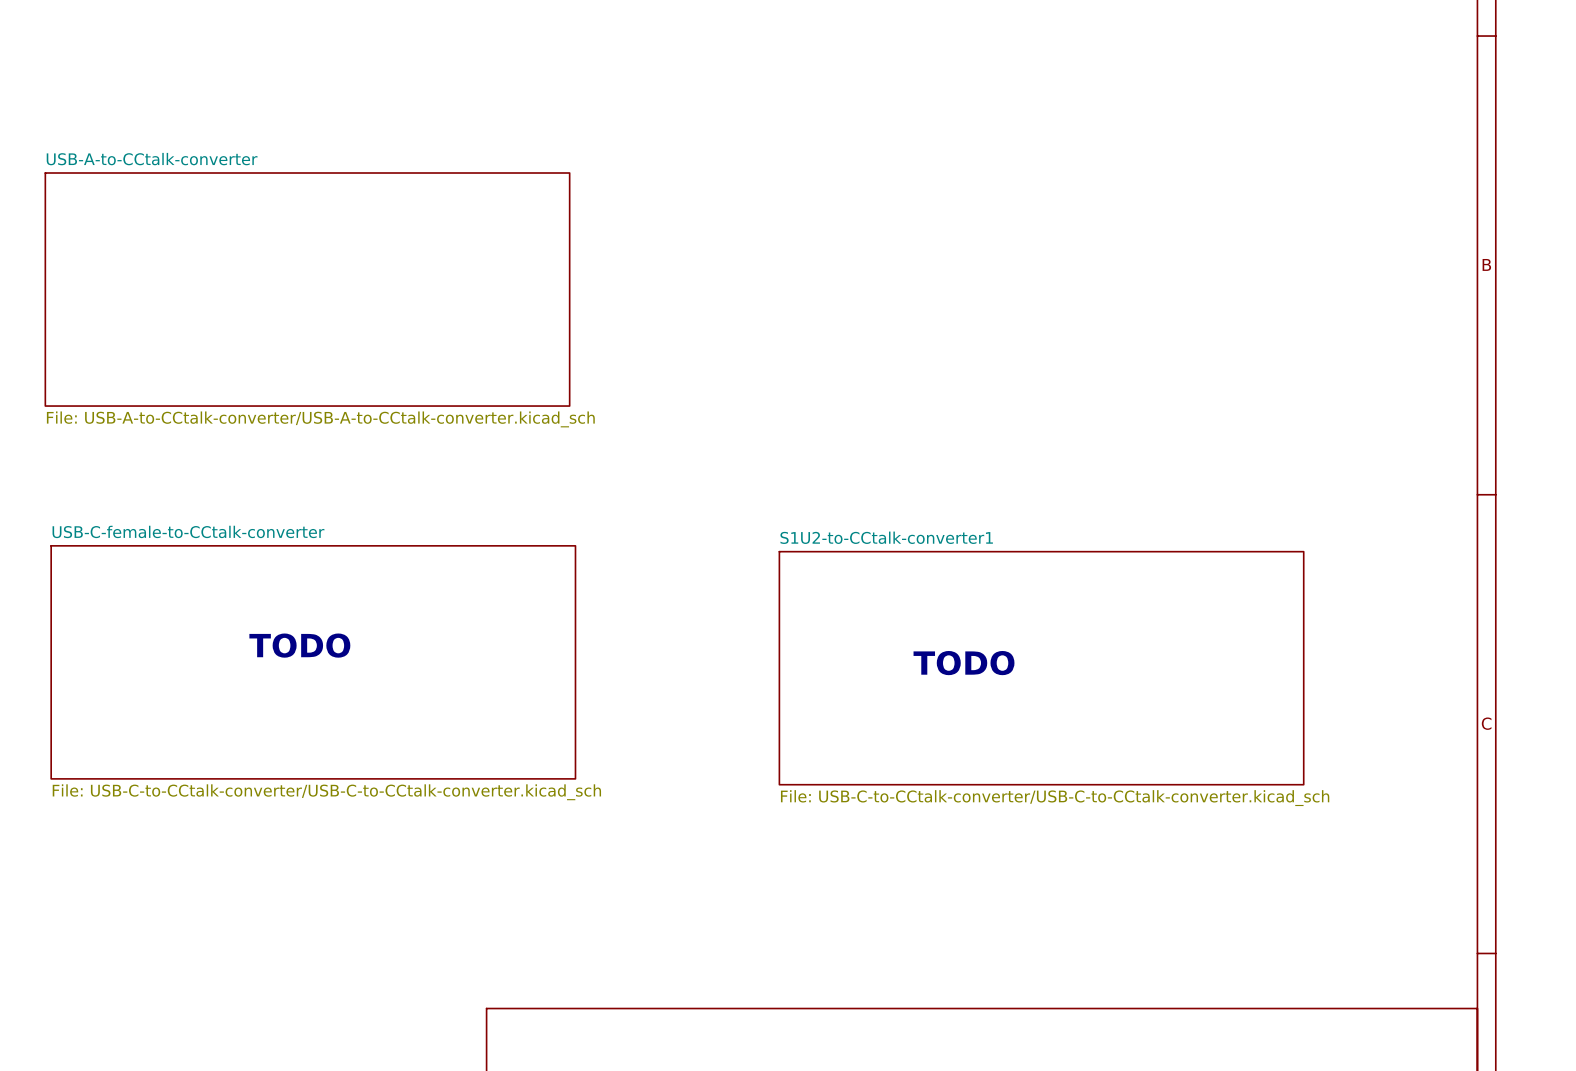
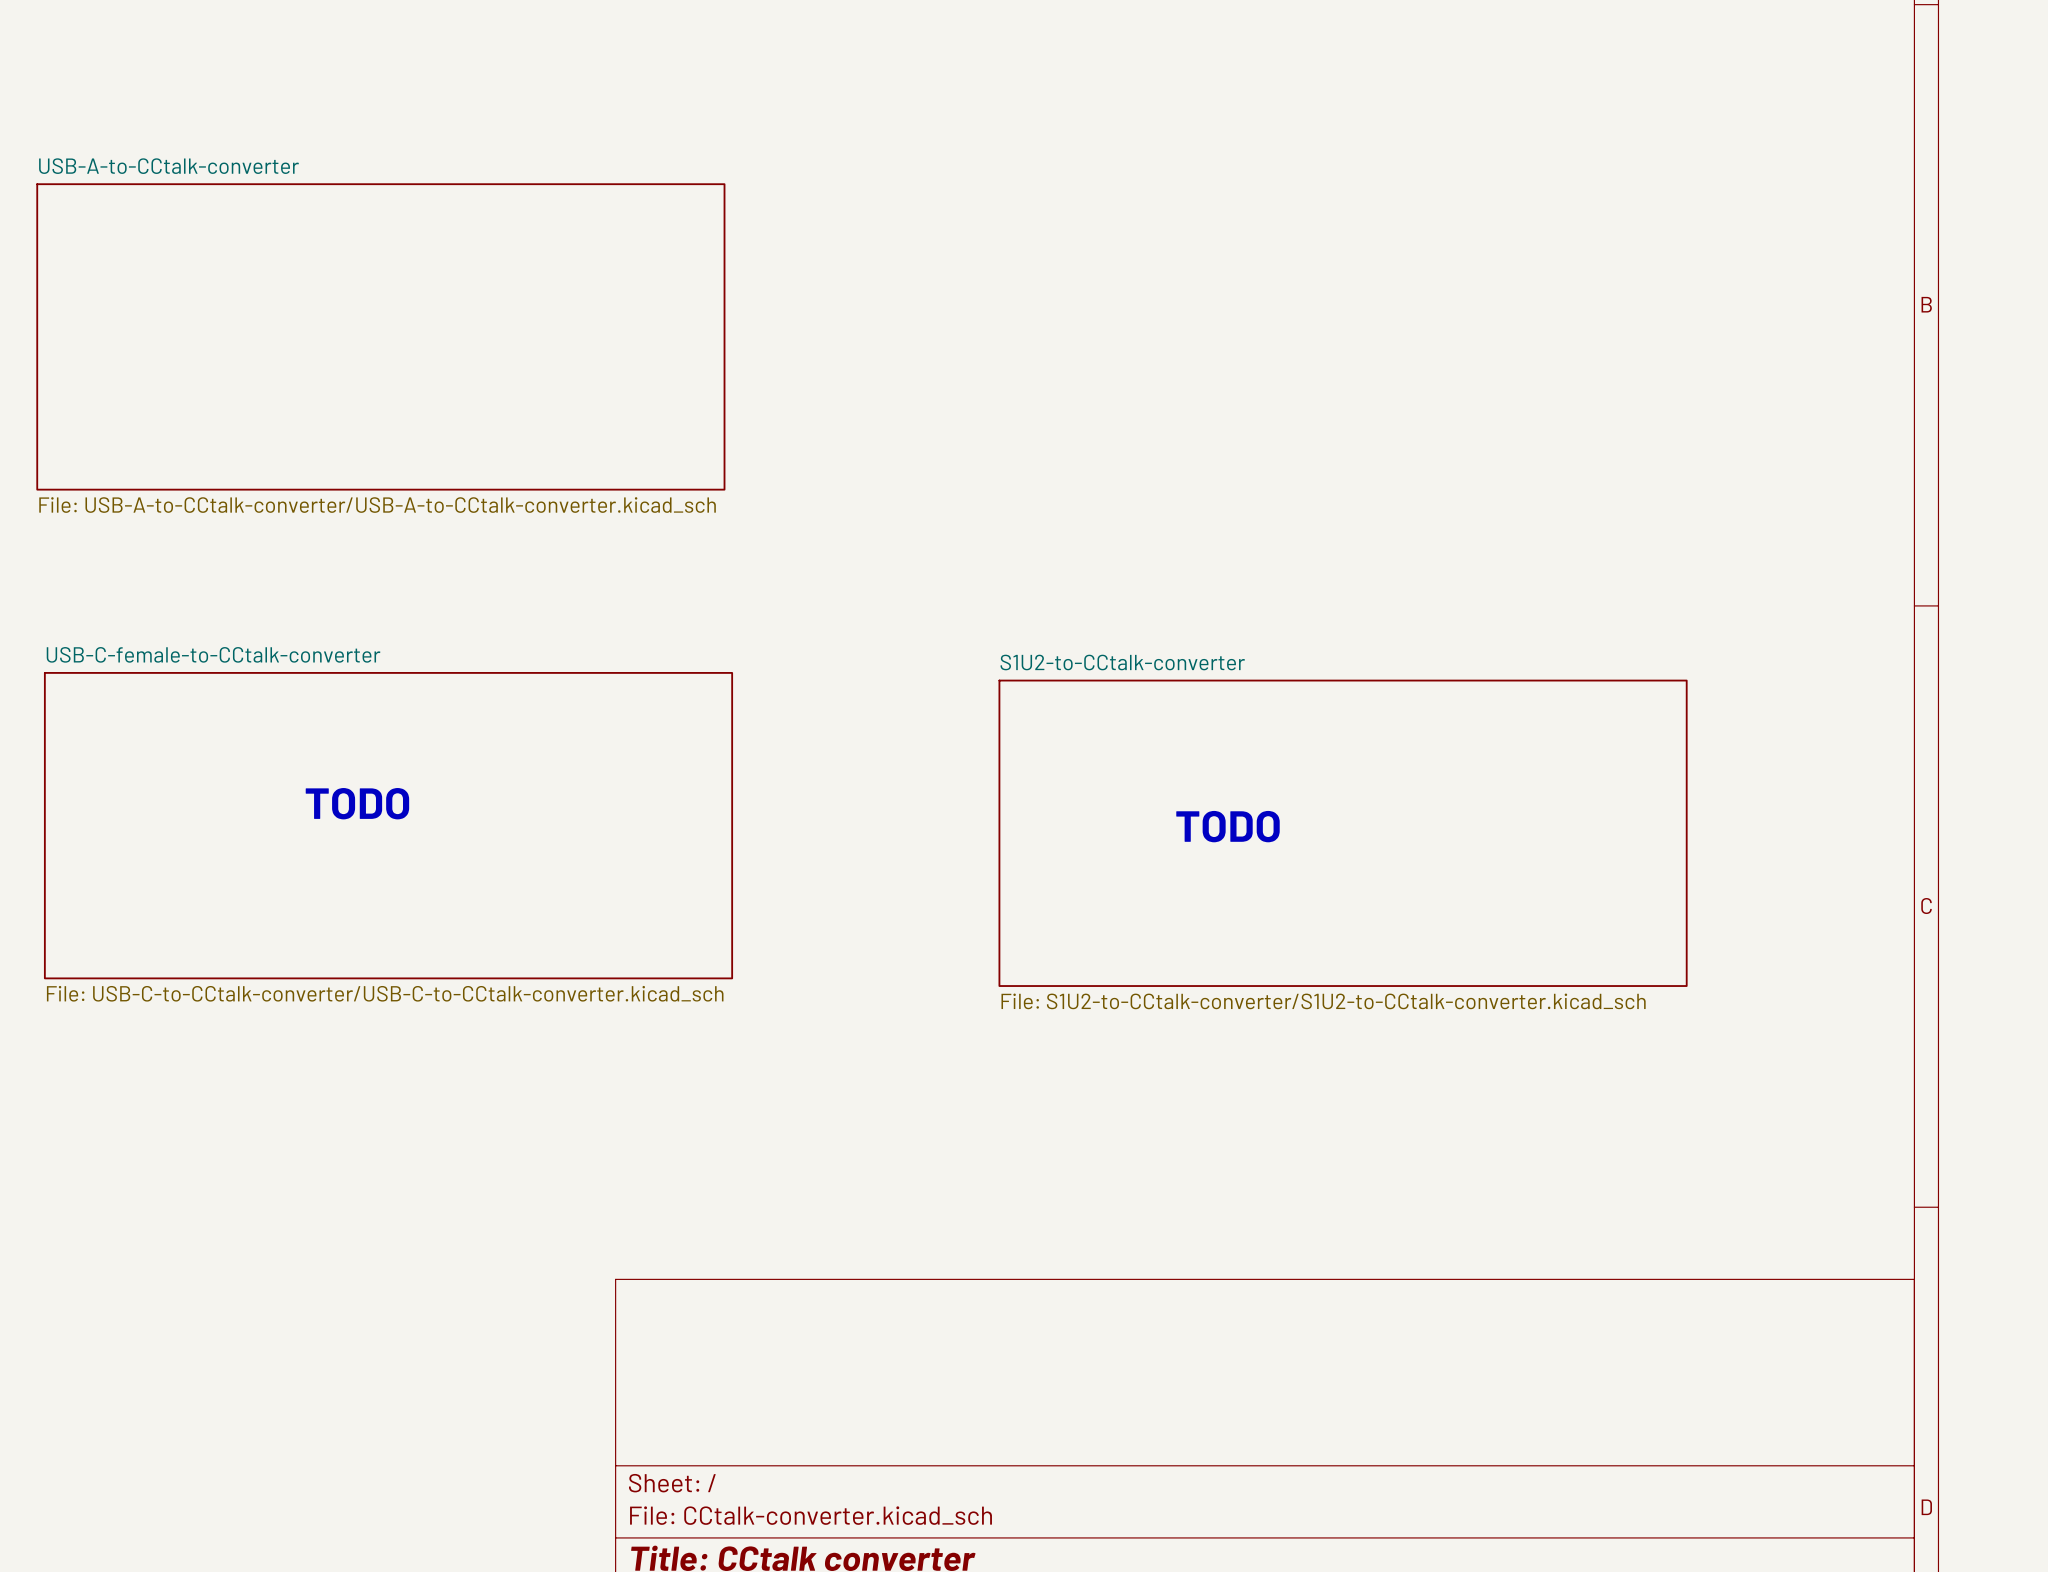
sheet S1U2-to-CCtalk-converter1 name: S1U2-to-CCtalk-converter1 (886, 537) -> S1U2-to-CCtalk-converter (1122, 662)
sheet S1U2-to-CCtalk-converter1 value: File: USB-C-to-CCtalk-converter/USB-C-to-CCtalk-converter.kicad_sch (1055, 798) -> File: S1U2-to-CCtalk-converter/S1U2-to-CCtalk-converter.kicad_sch (1323, 1001)

